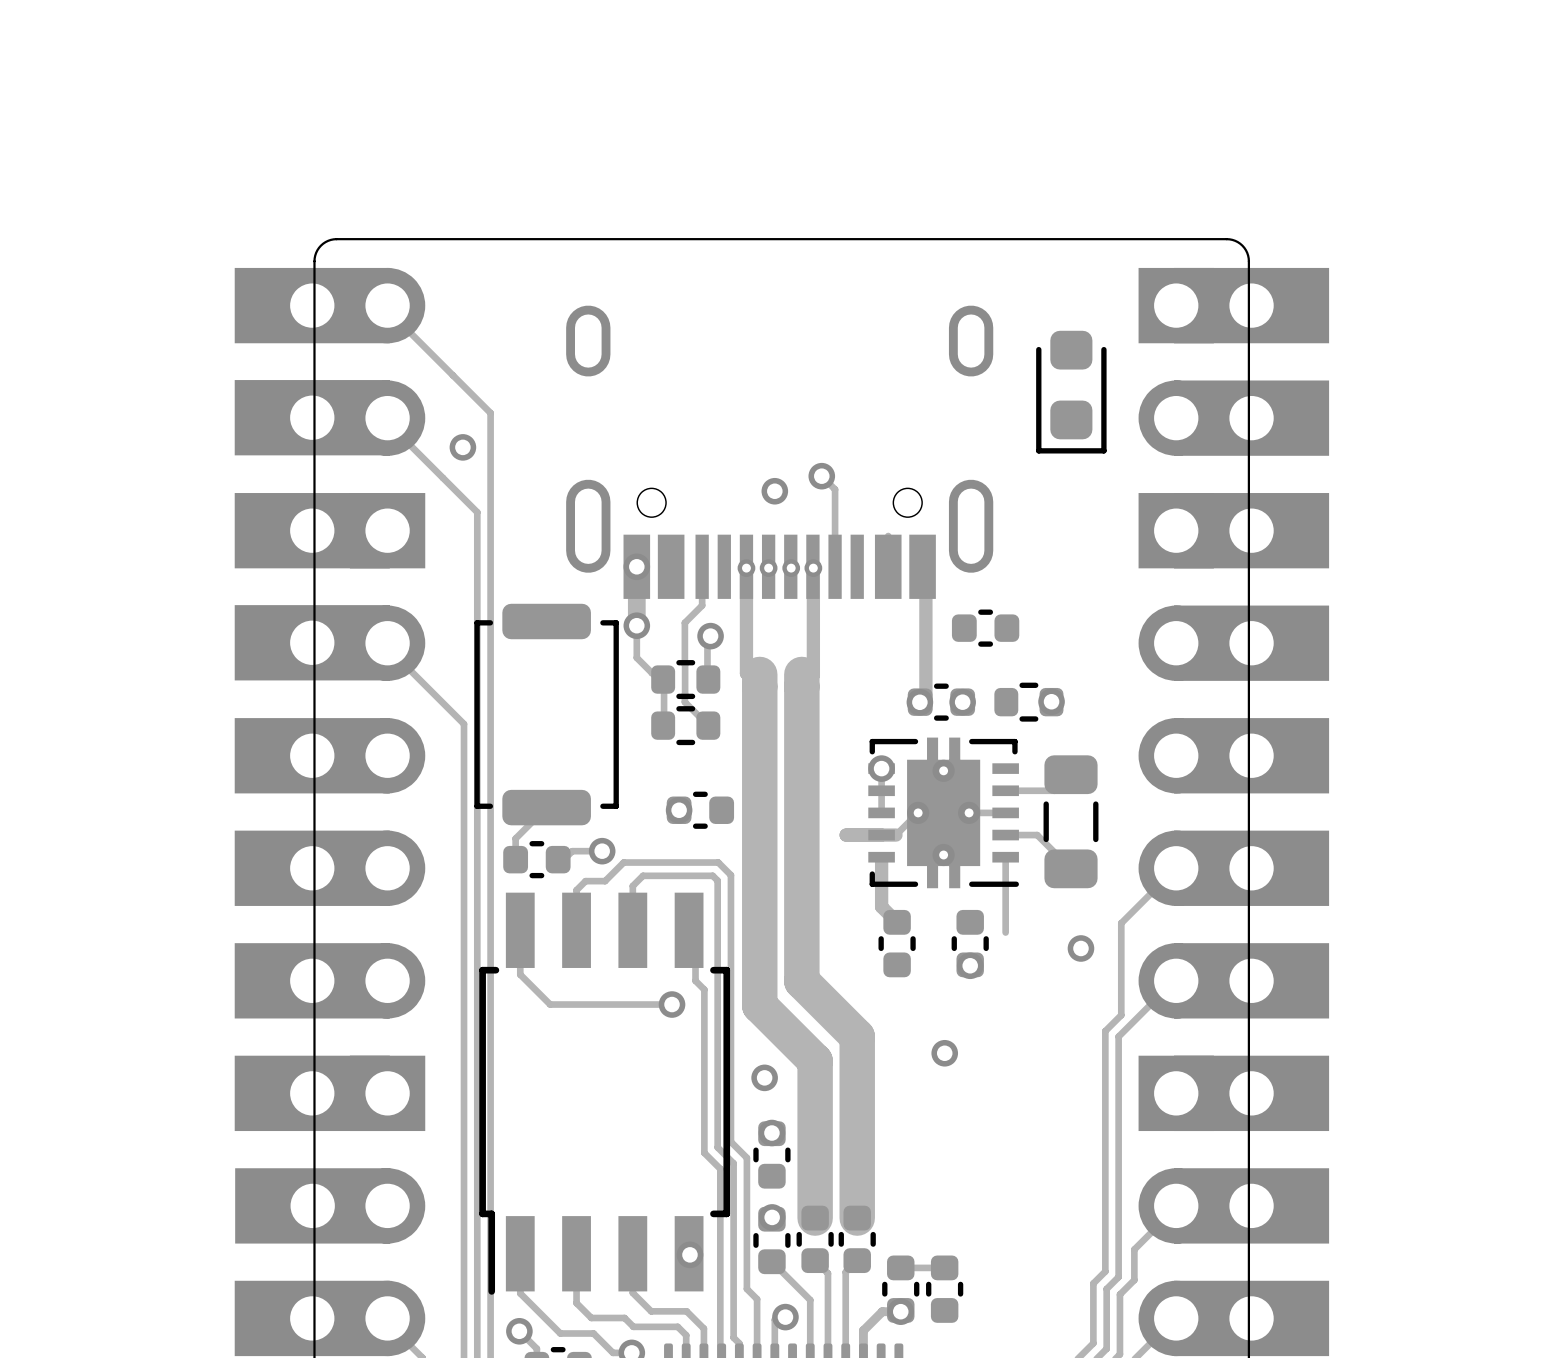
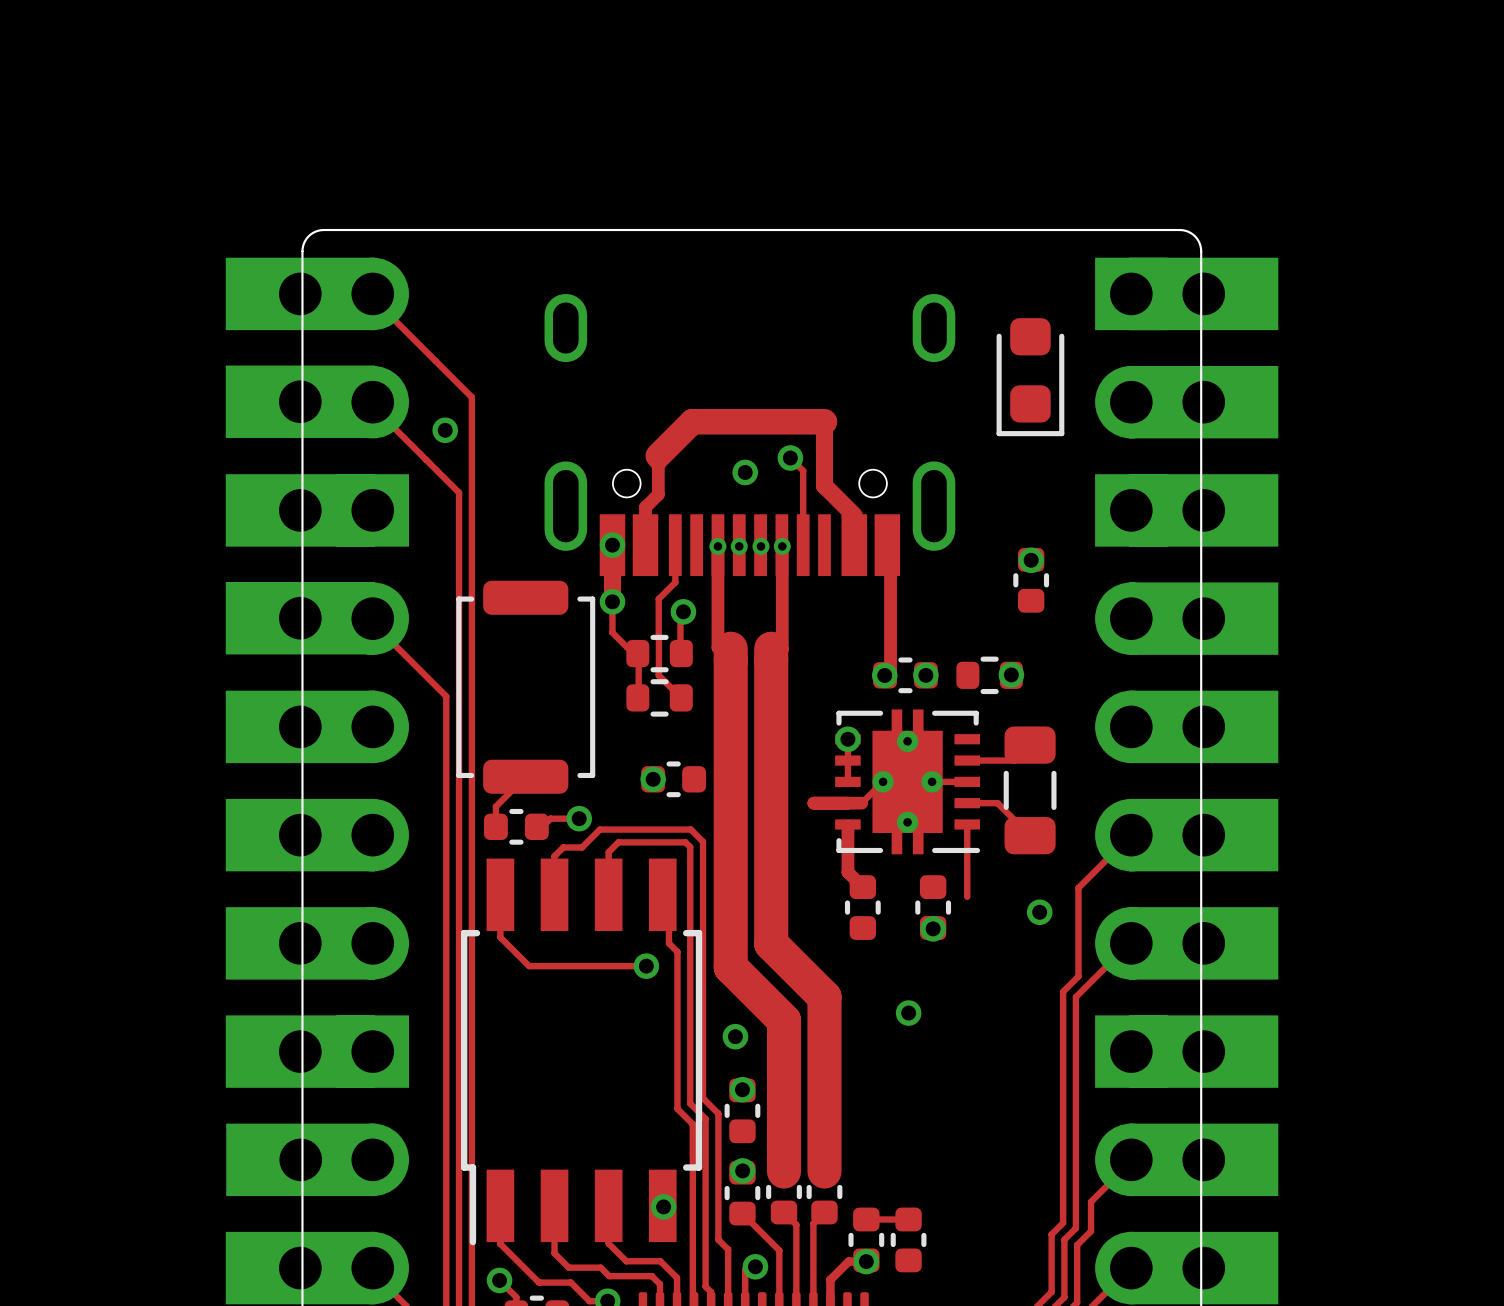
track: none -> (854, 515) (824, 485) (824, 421) (692, 421) (658, 455) (658, 494) (645, 507) (645, 545)
via: none -> (1031, 560)
part rotation: 0° (985, 628) -> 90° clockwise (1031, 580)
part position: (985, 628) -> (1031, 580)

